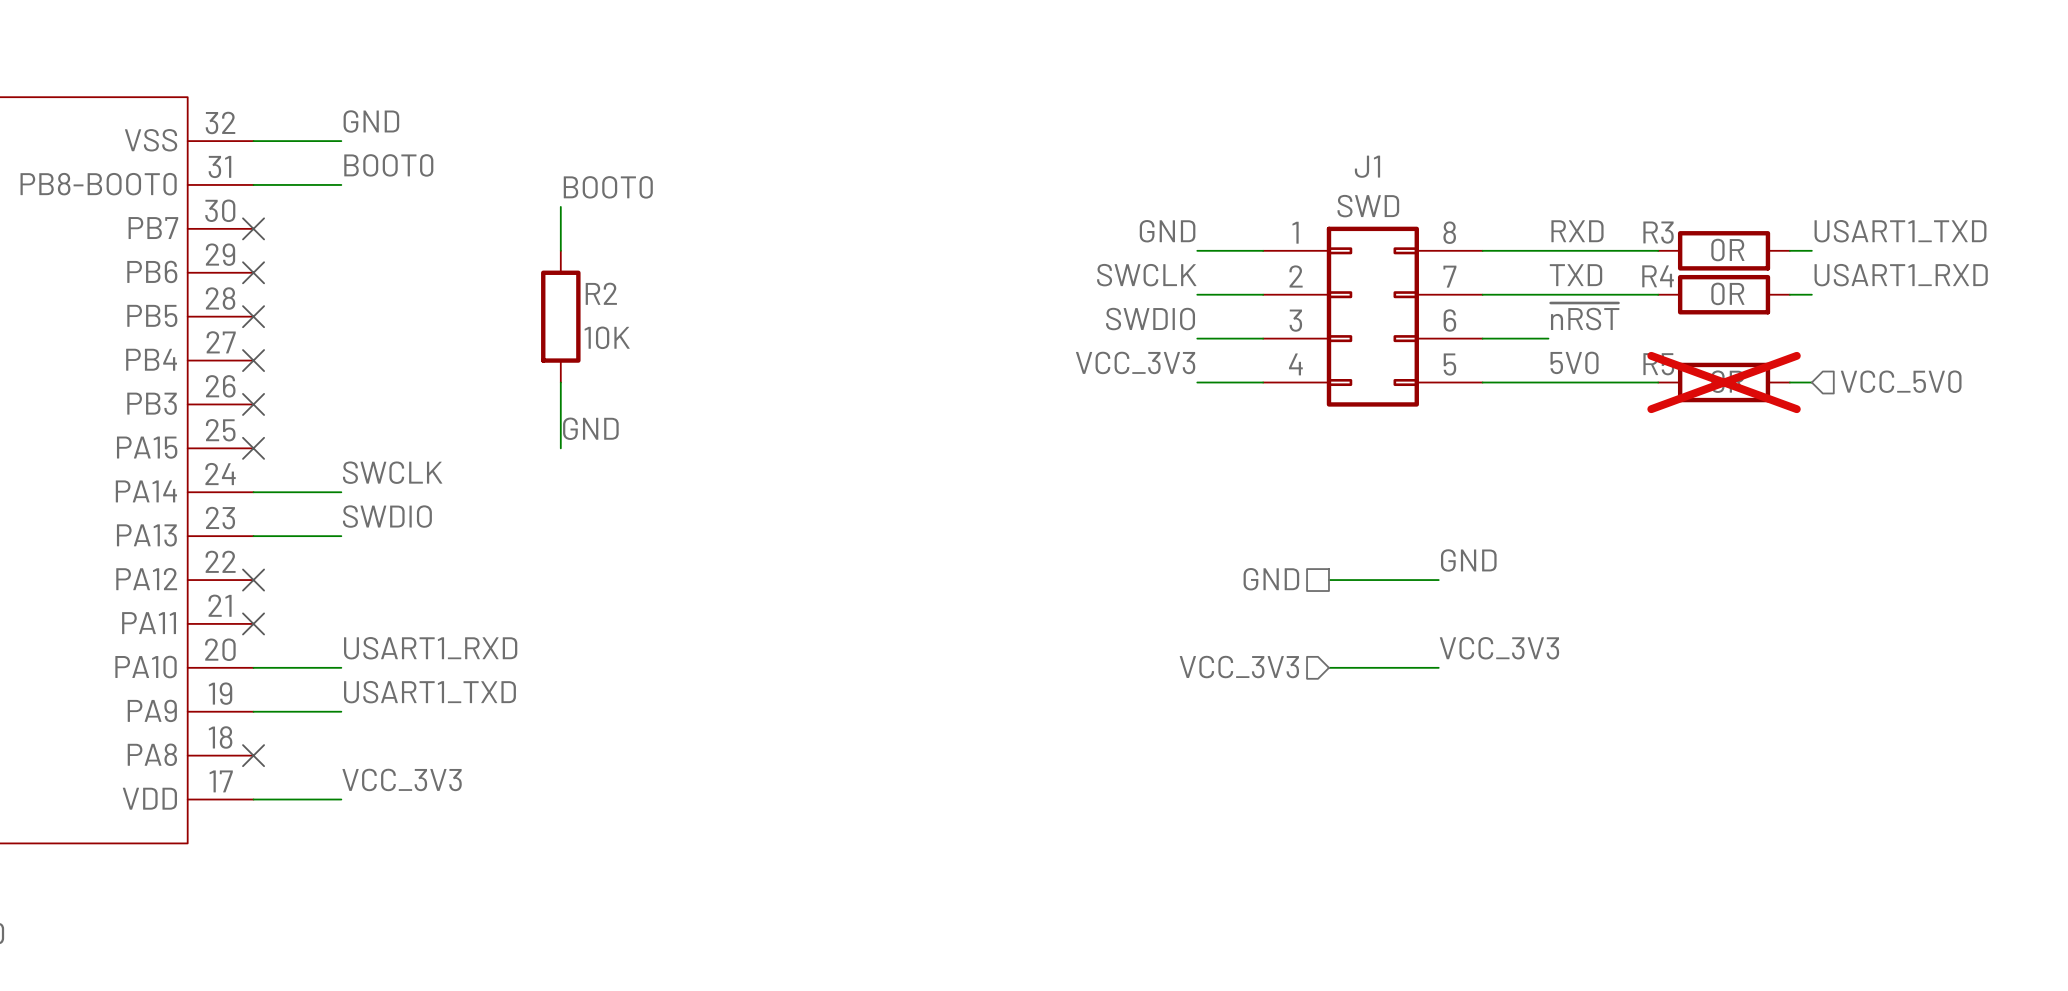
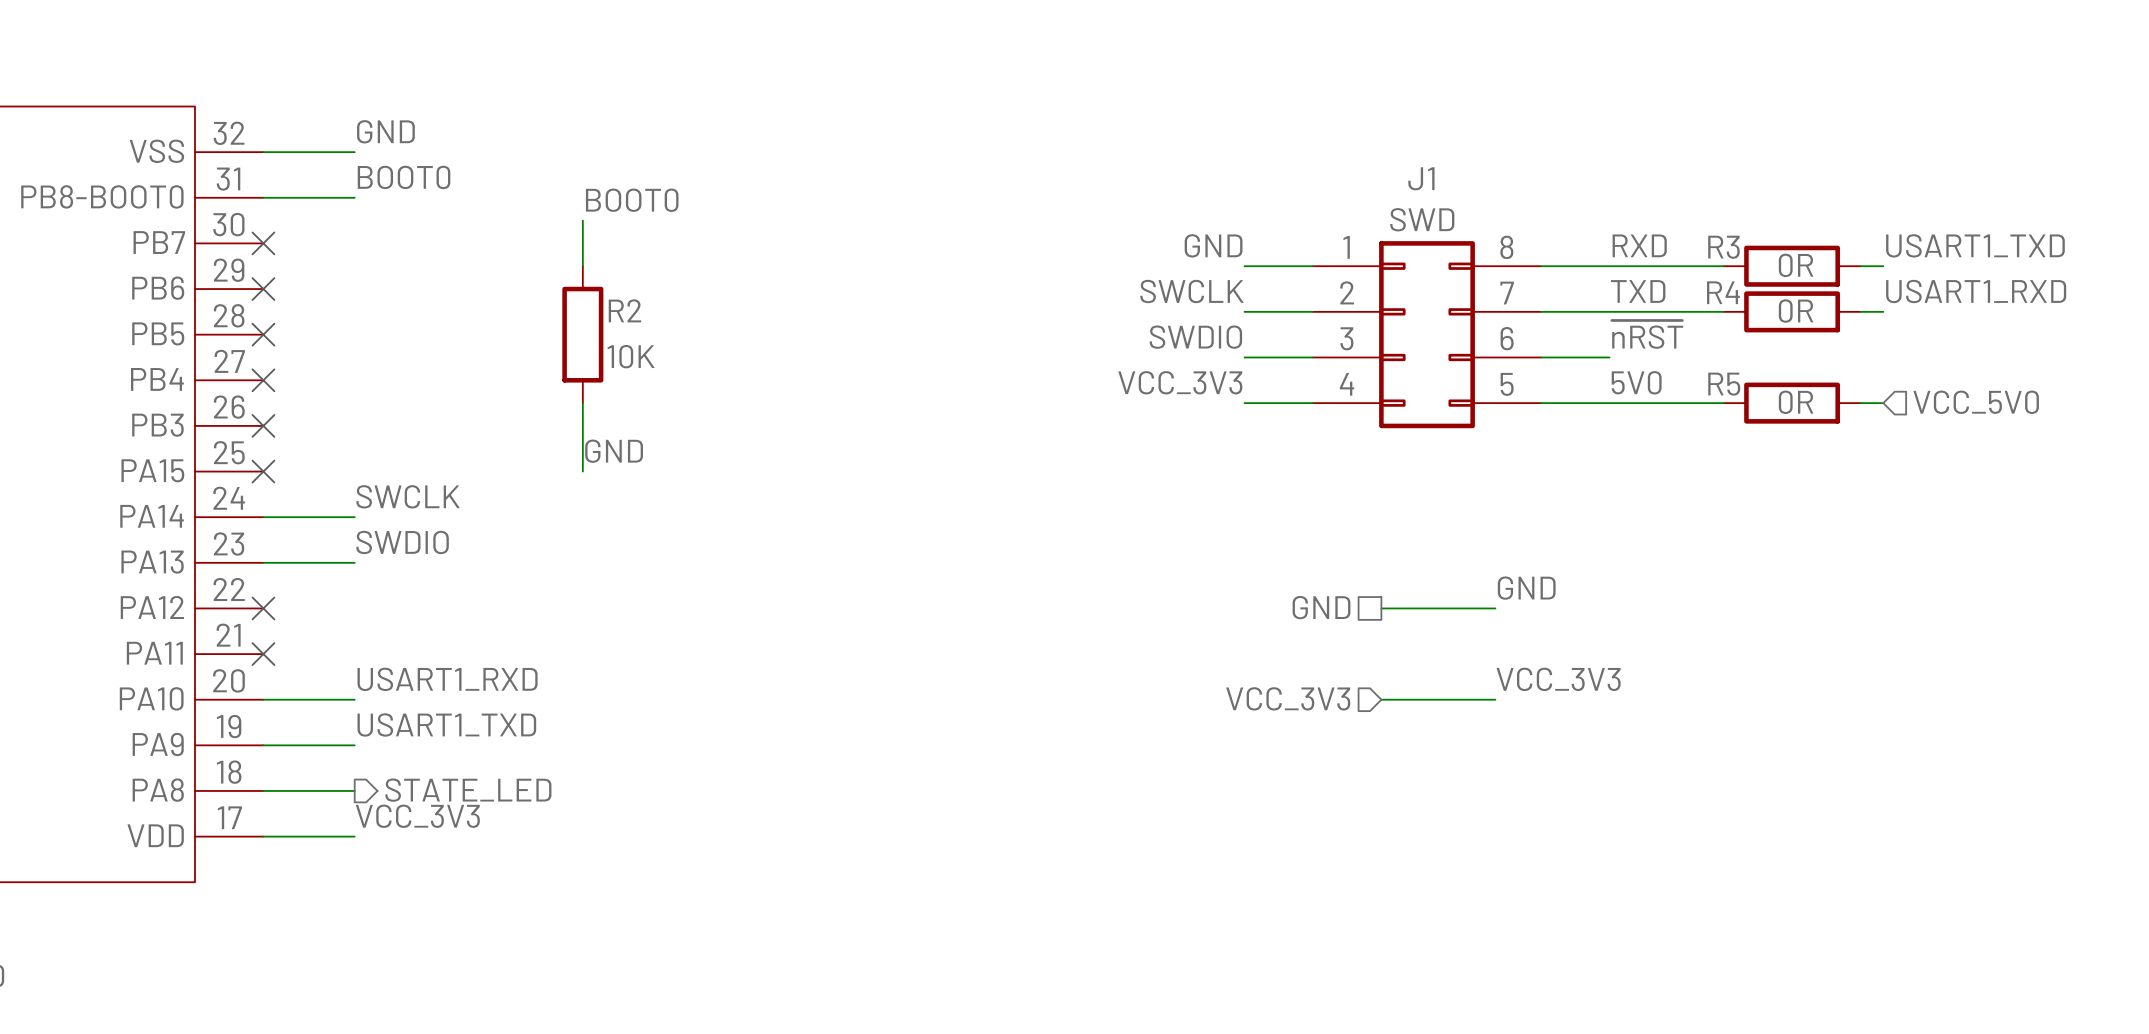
R5 do-not-place cross: (1724, 382) -> none
hierarchical label: none -> STATE_LED (468, 790)
wire: none -> (263, 790) (354, 790)
no-connect mark: (253, 755) -> none

